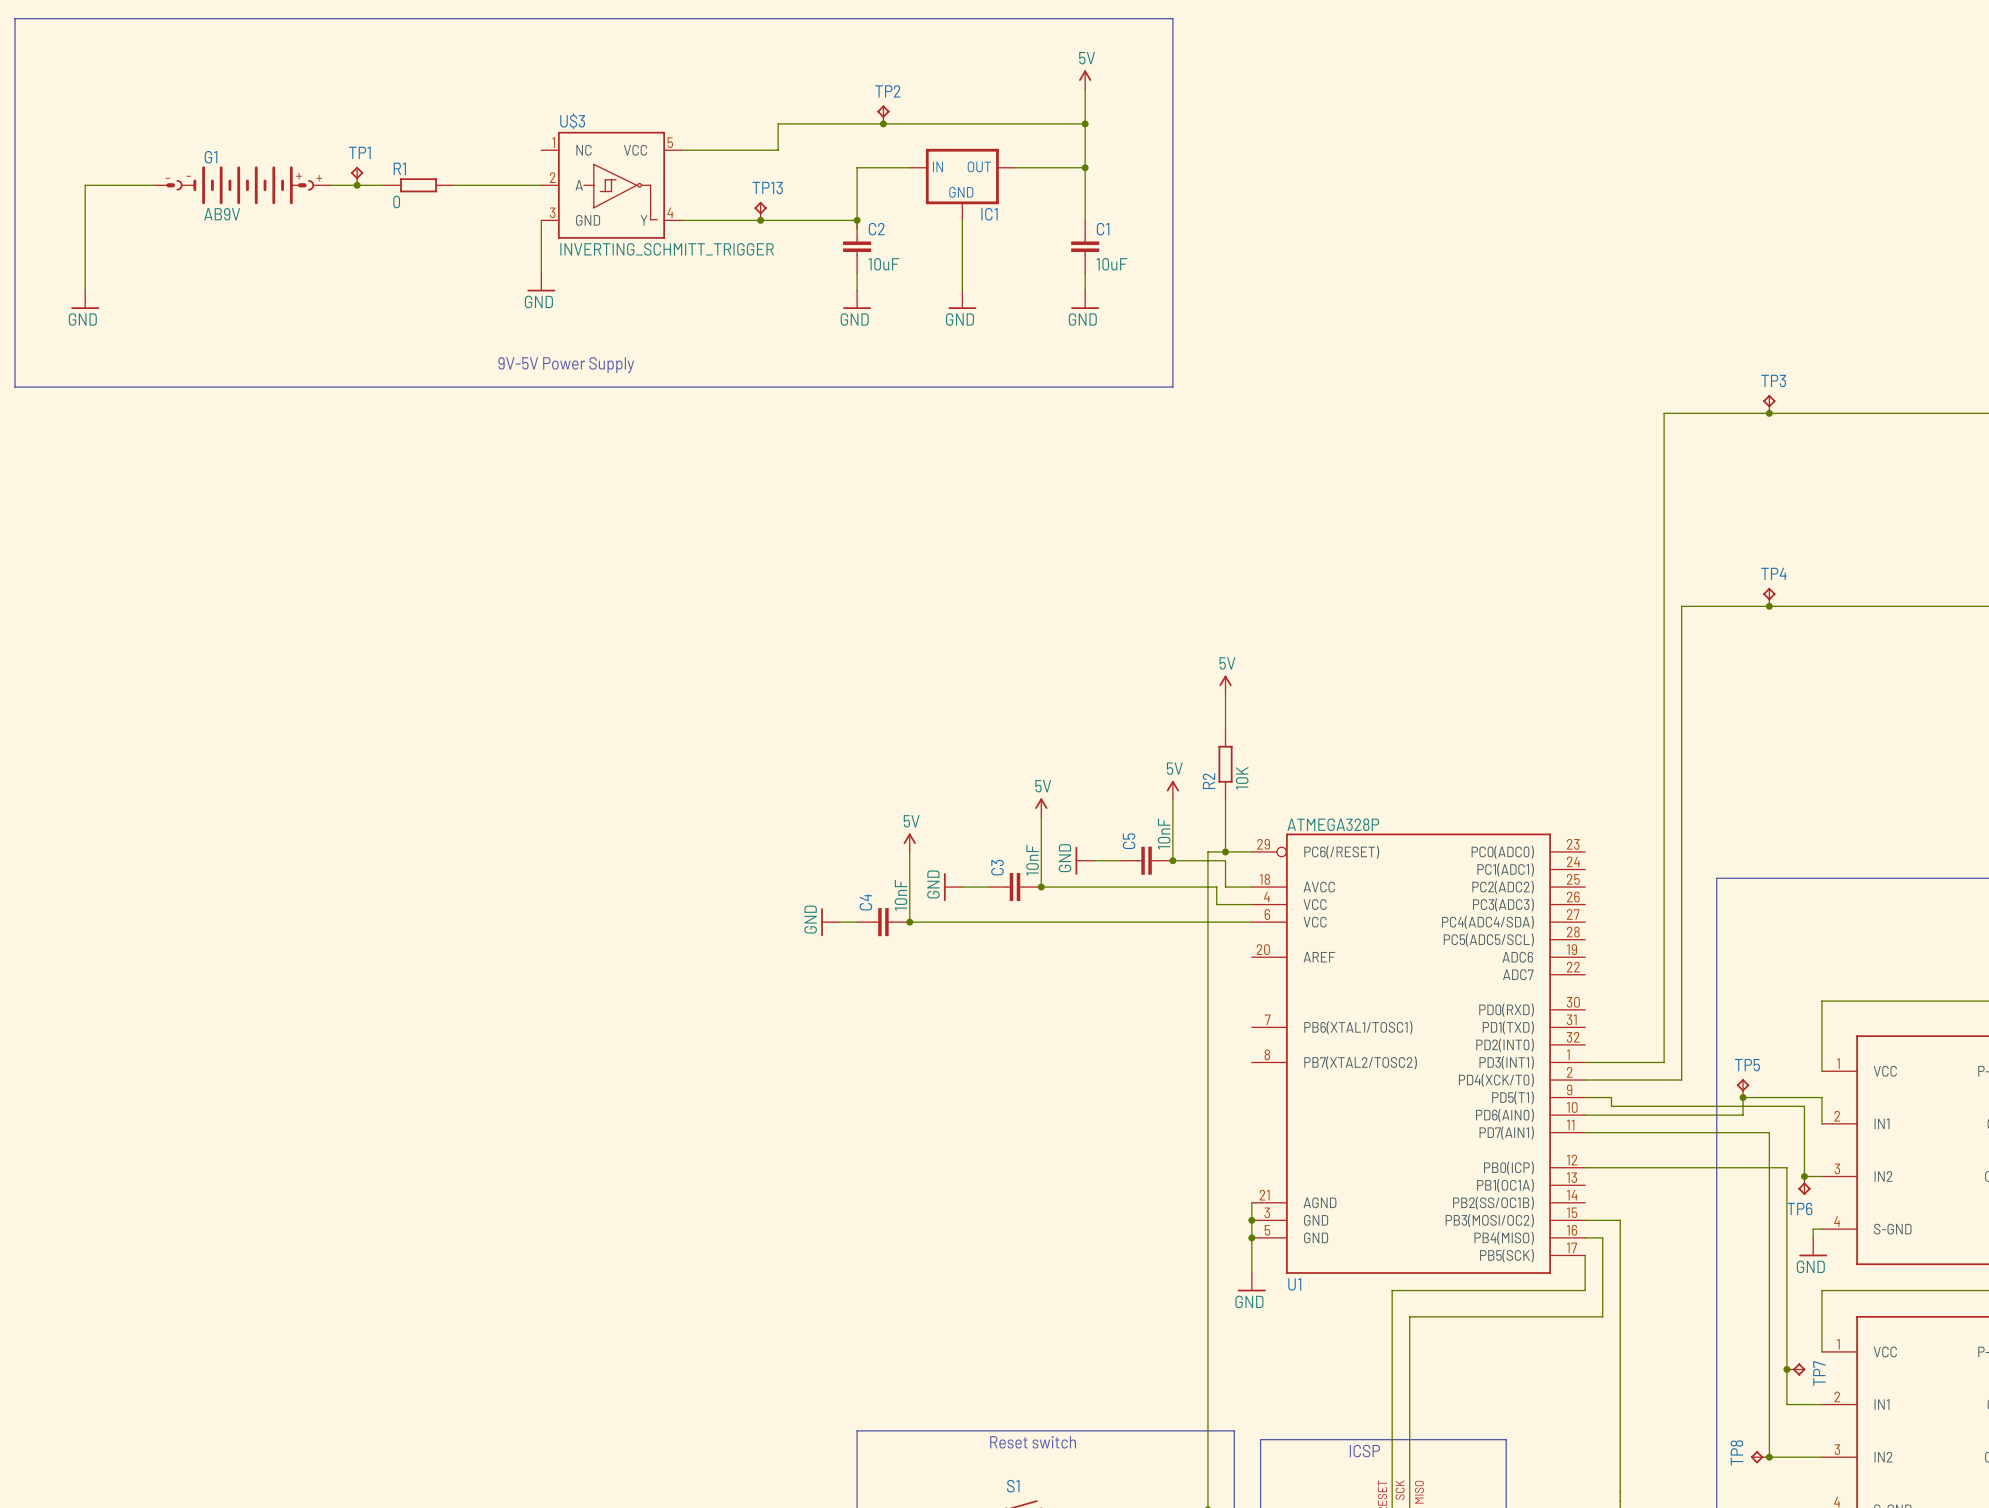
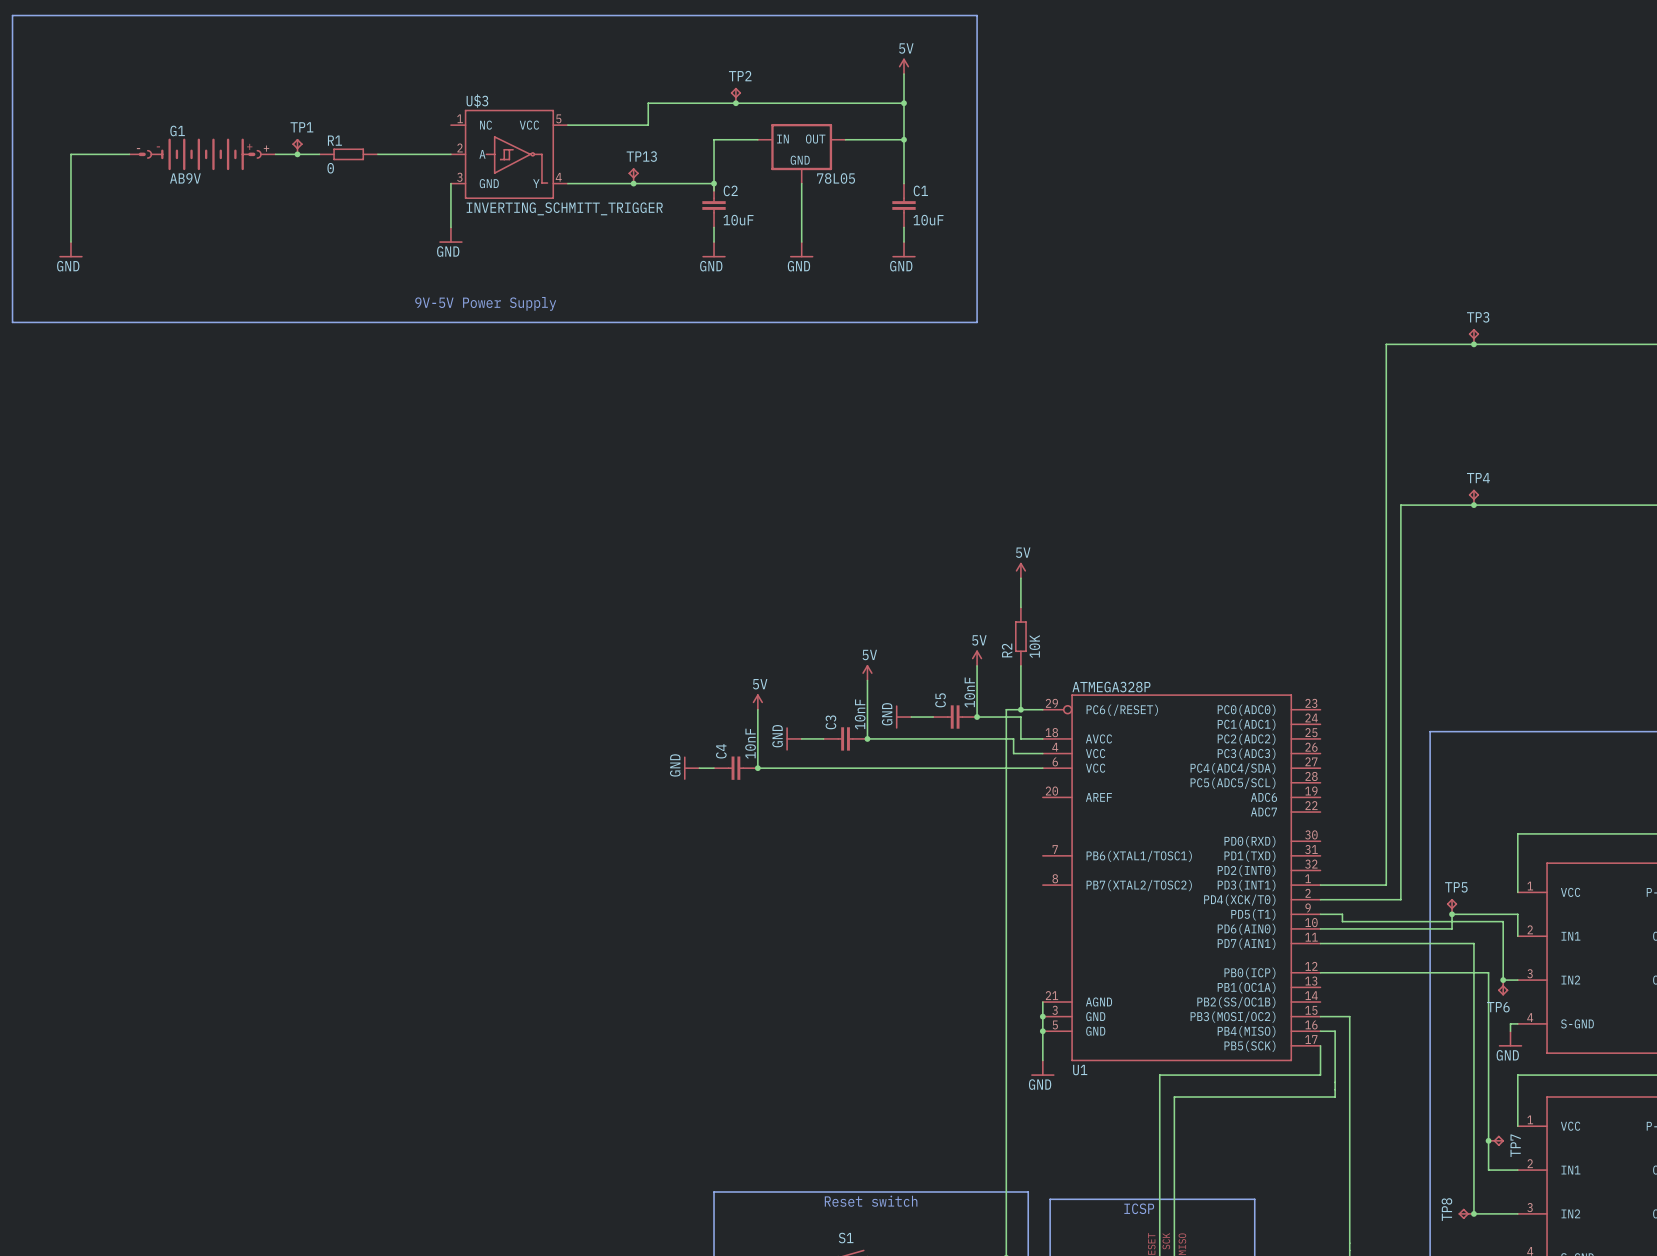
IC1 name: IC1 (989, 214) -> 78L05 (836, 178)

